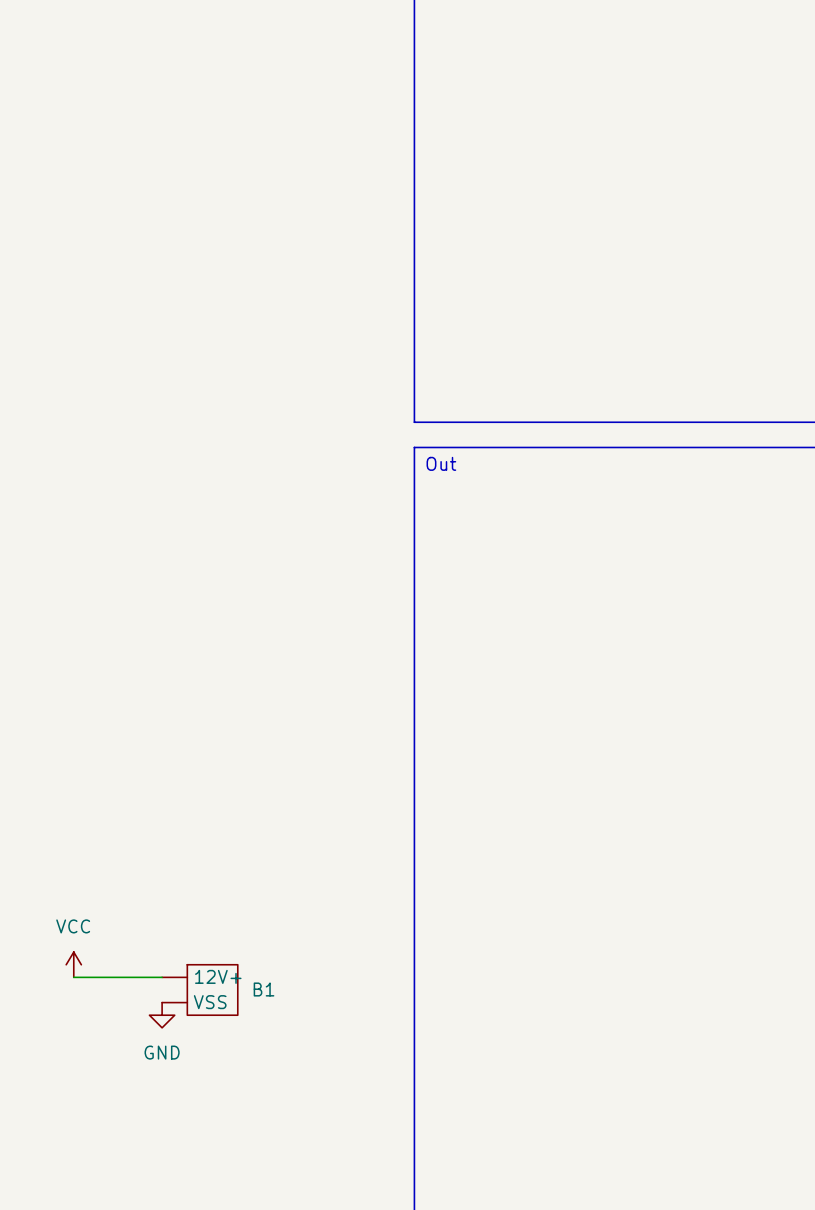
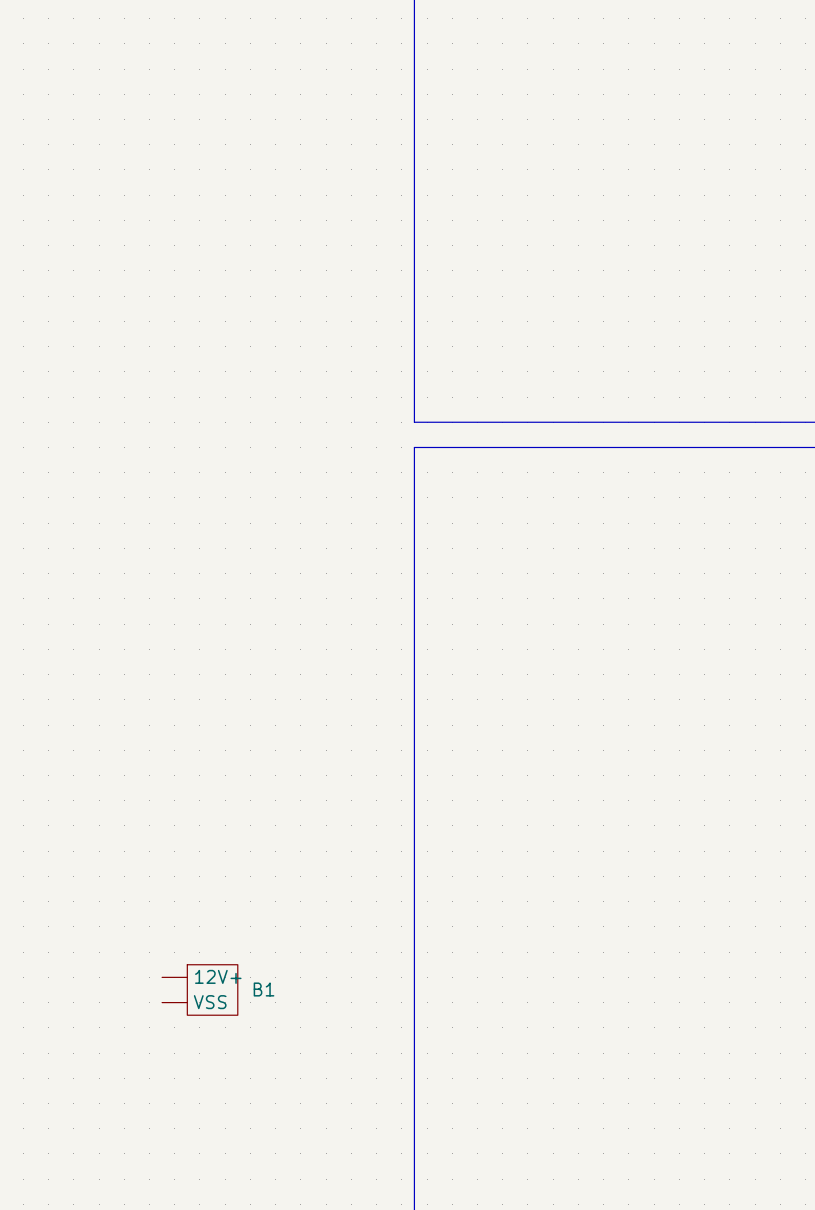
text: Out (441, 463) -> none
power symbol: VCC (73, 964) -> none
wire: (73, 977) (162, 977) -> none
power symbol: GND (162, 1015) -> none

